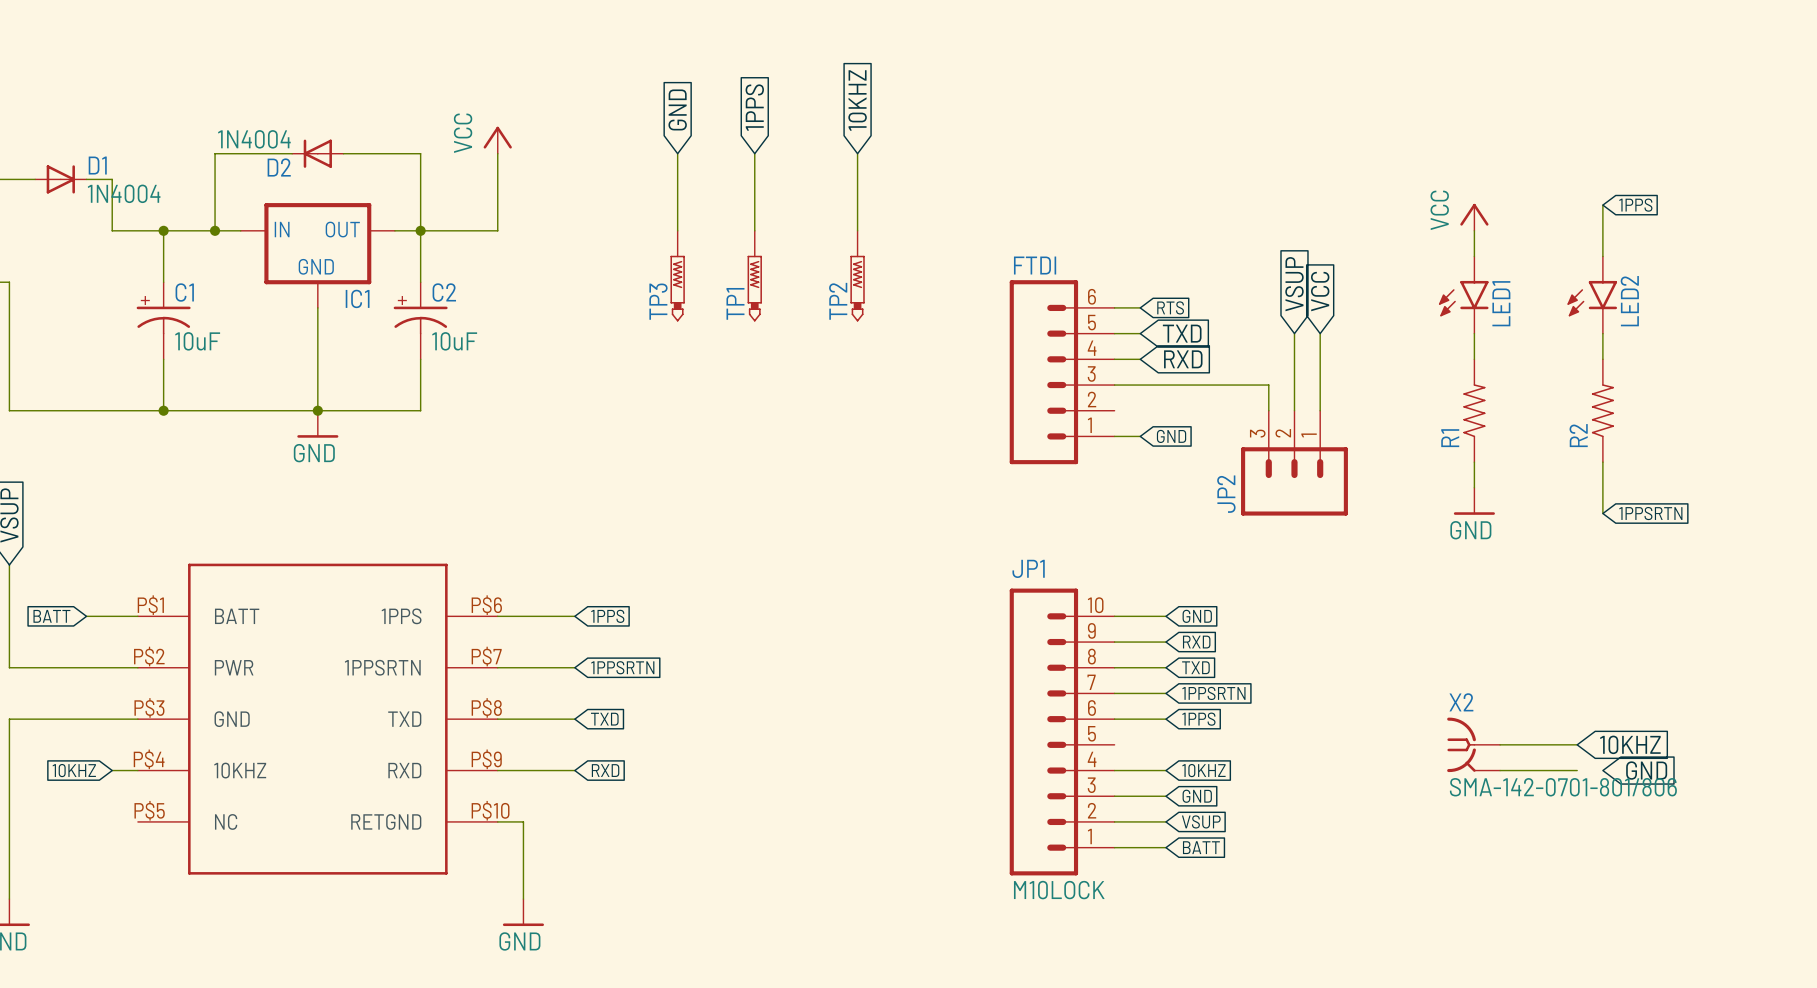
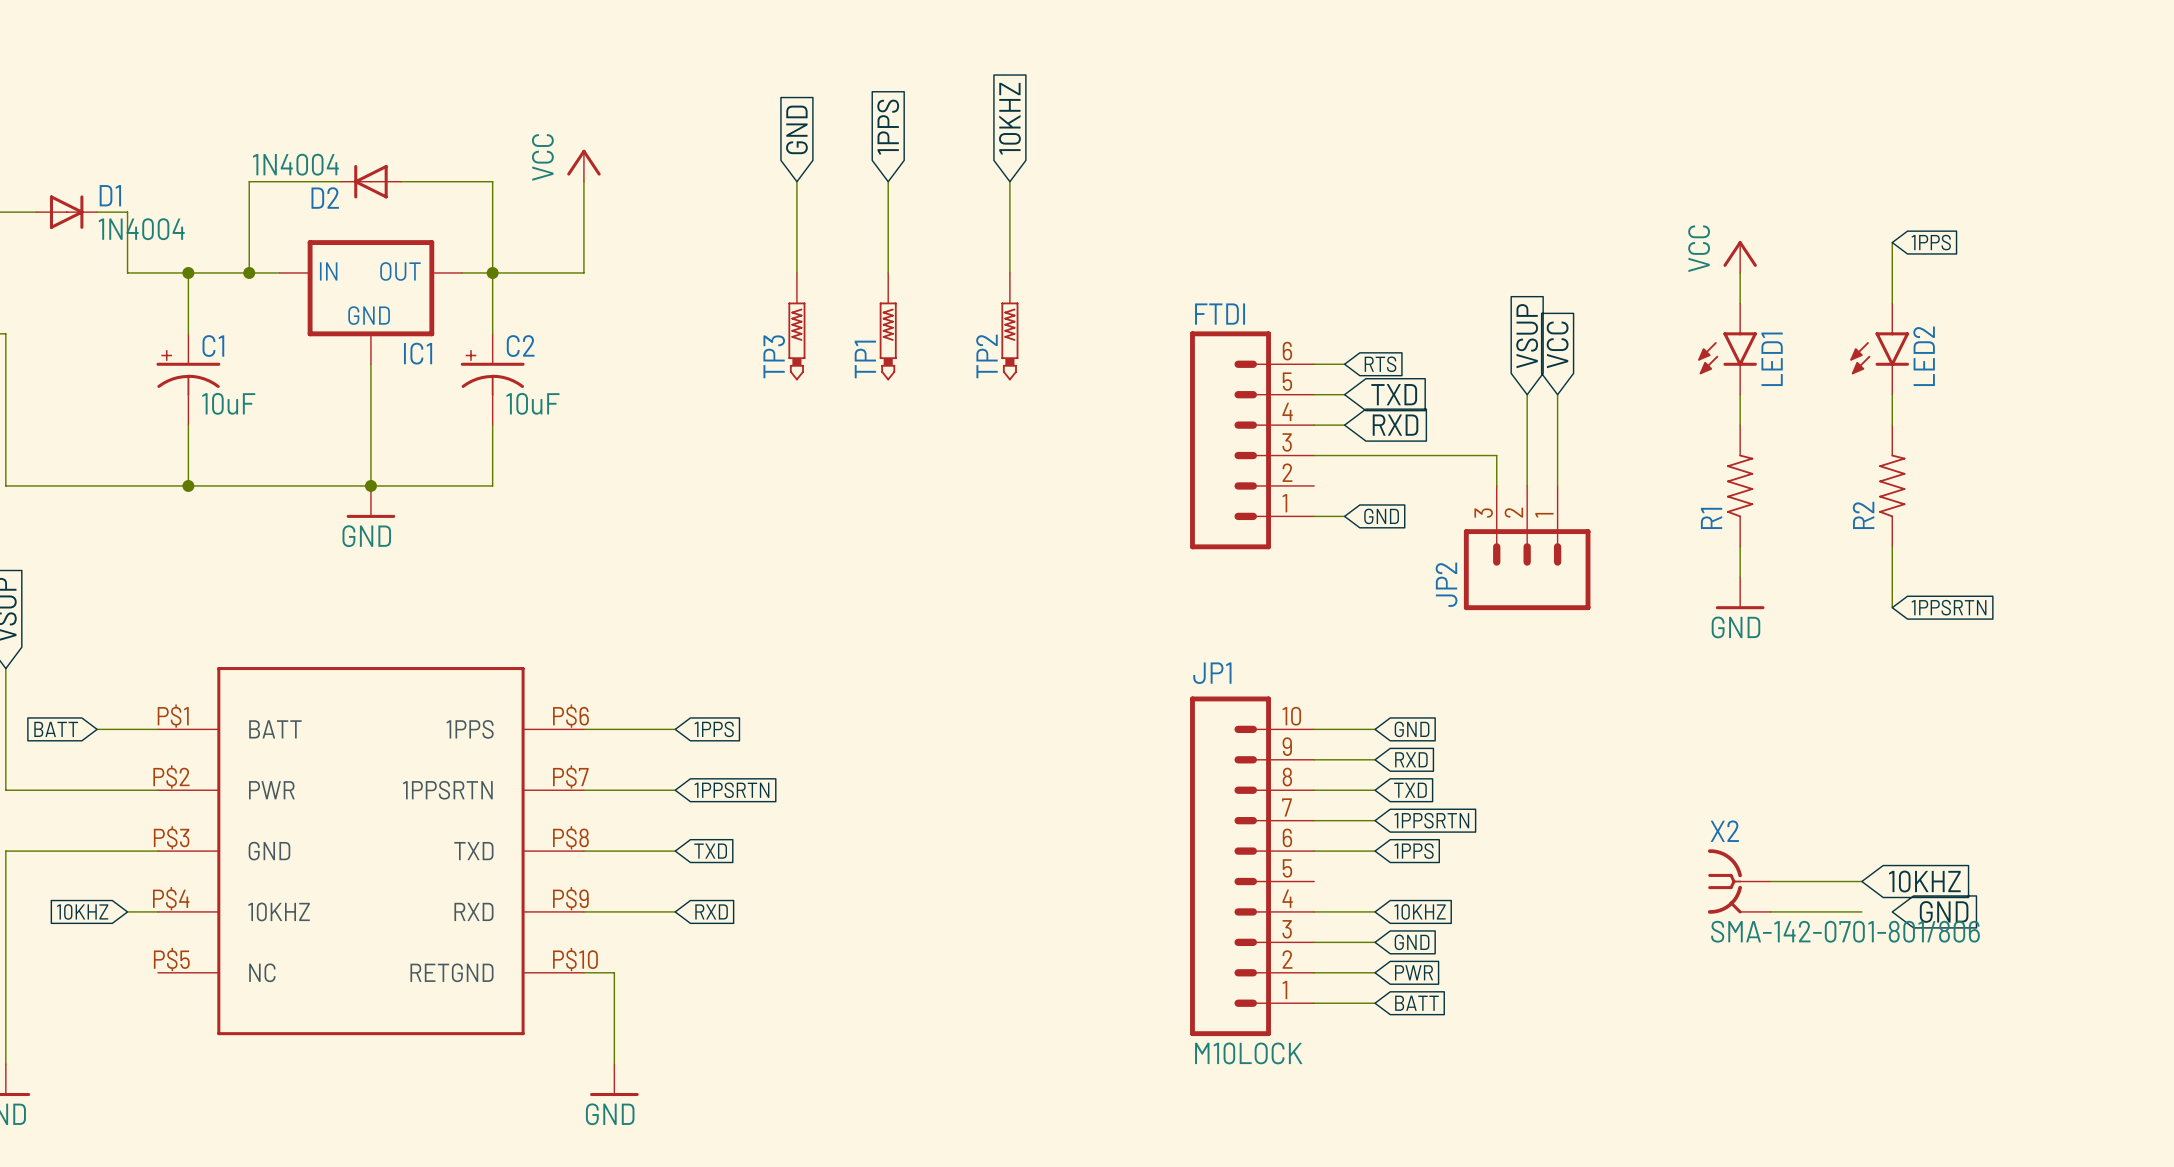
global label: VSUP (1201, 821) -> PWR (1414, 972)

